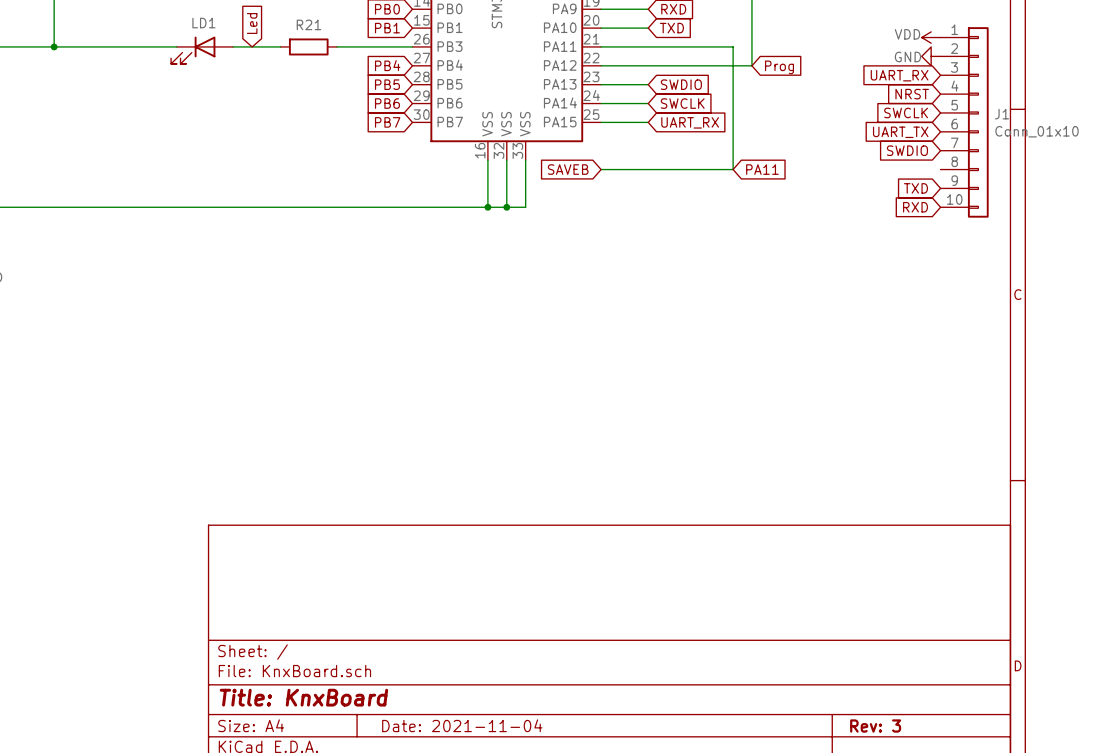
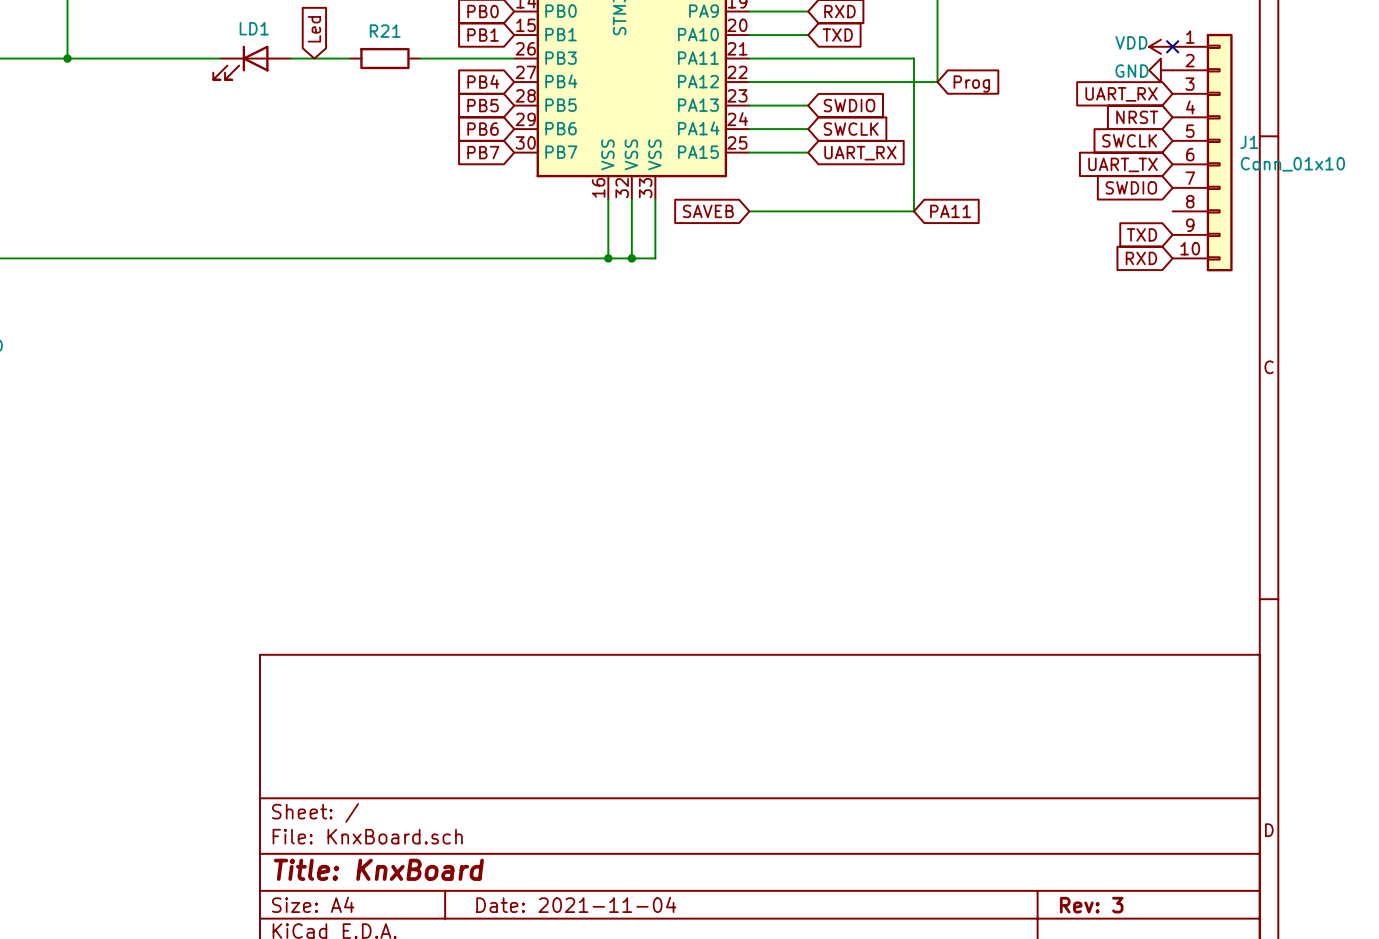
no-connect mark: none -> (1172, 46)

